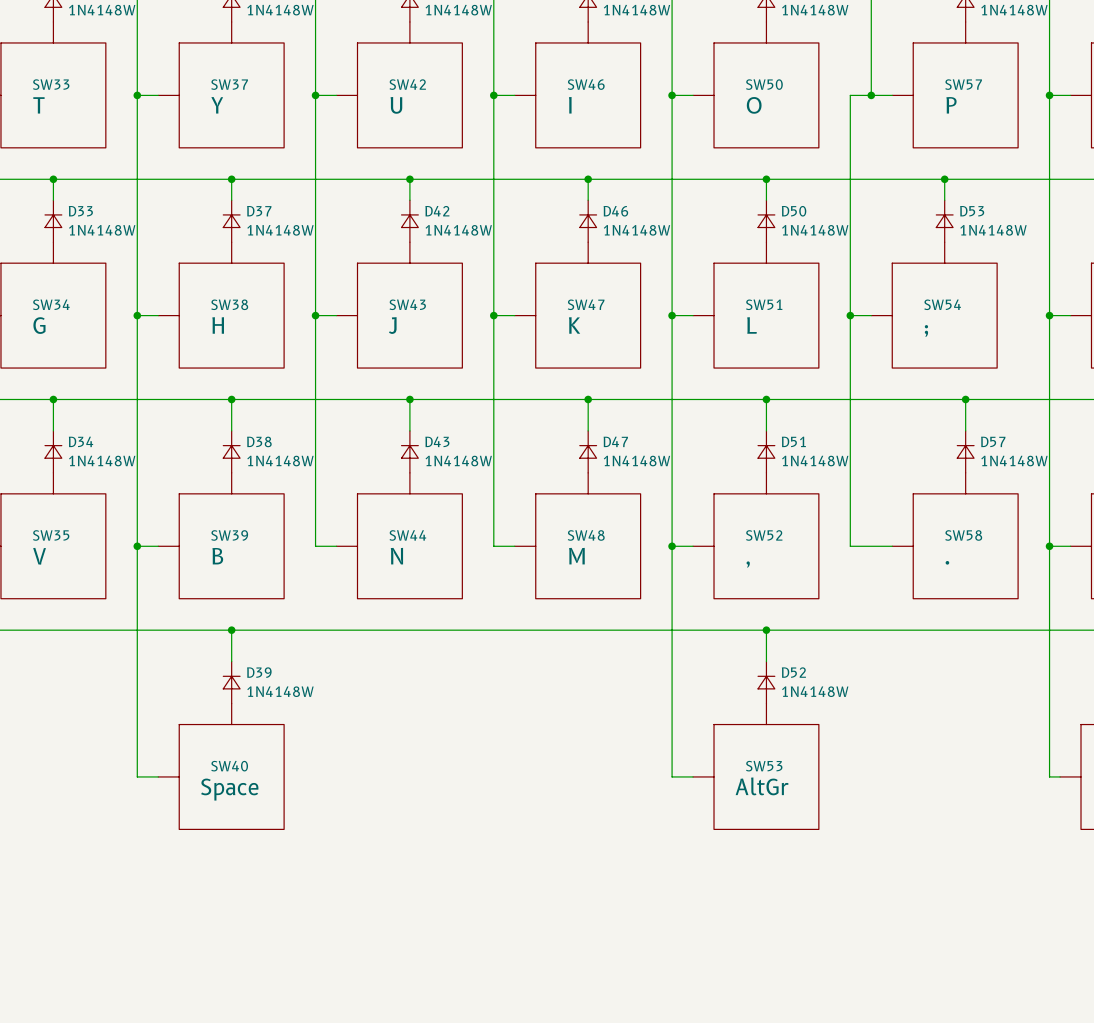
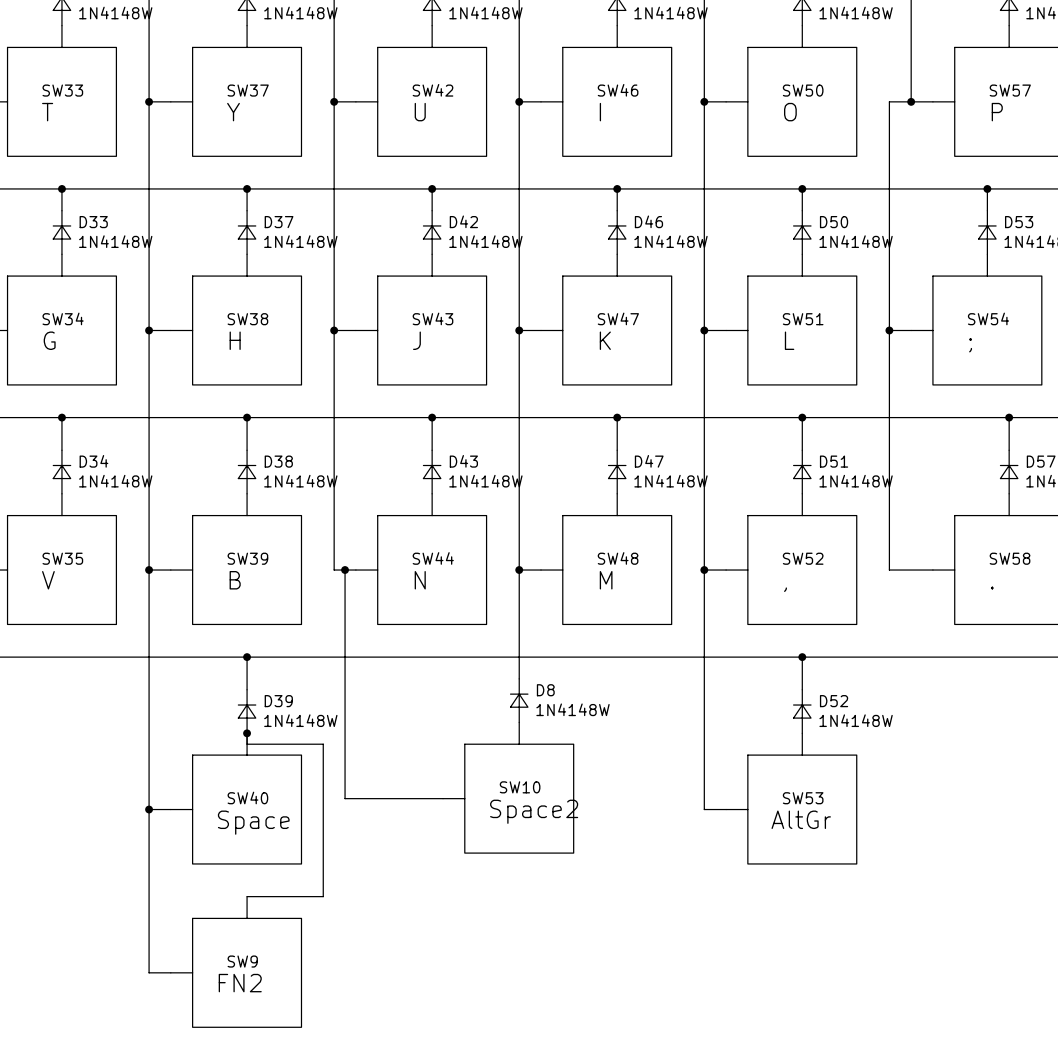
wire: none -> (345, 570) (345, 798) (443, 798)
junction: none -> (345, 570)
wire: none -> (519, 570) (519, 678)
junction: none -> (519, 570)
D8: none -> 1N4148W (519, 700)
wire: none -> (247, 733) (247, 744) (323, 744) (323, 896) (247, 896)
junction: none -> (247, 733)
SW10: none -> Space2 (508, 787)
wire: none -> (149, 809) (149, 972) (170, 972)
junction: none -> (149, 809)
SW9: none -> FN2 (236, 961)

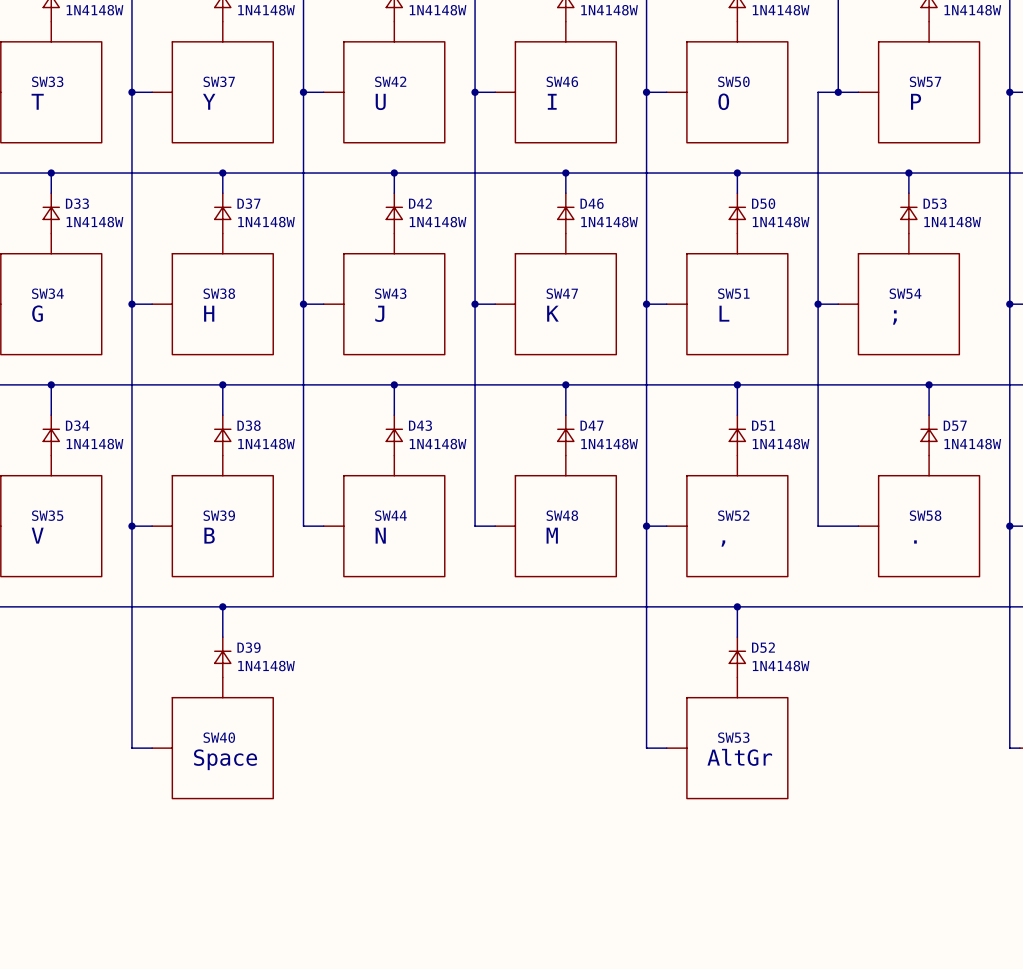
wire: (345, 570) (345, 798) (443, 798) -> none
junction: (345, 570) -> none
wire: (519, 570) (519, 678) -> none
junction: (519, 570) -> none
D8: 1N4148W (519, 700) -> none
wire: (247, 733) (247, 744) (323, 744) (323, 896) (247, 896) -> none
junction: (247, 733) -> none
SW10: Space2 (508, 787) -> none
wire: (149, 809) (149, 972) (170, 972) -> none
junction: (149, 809) -> none
SW9: FN2 (236, 961) -> none

